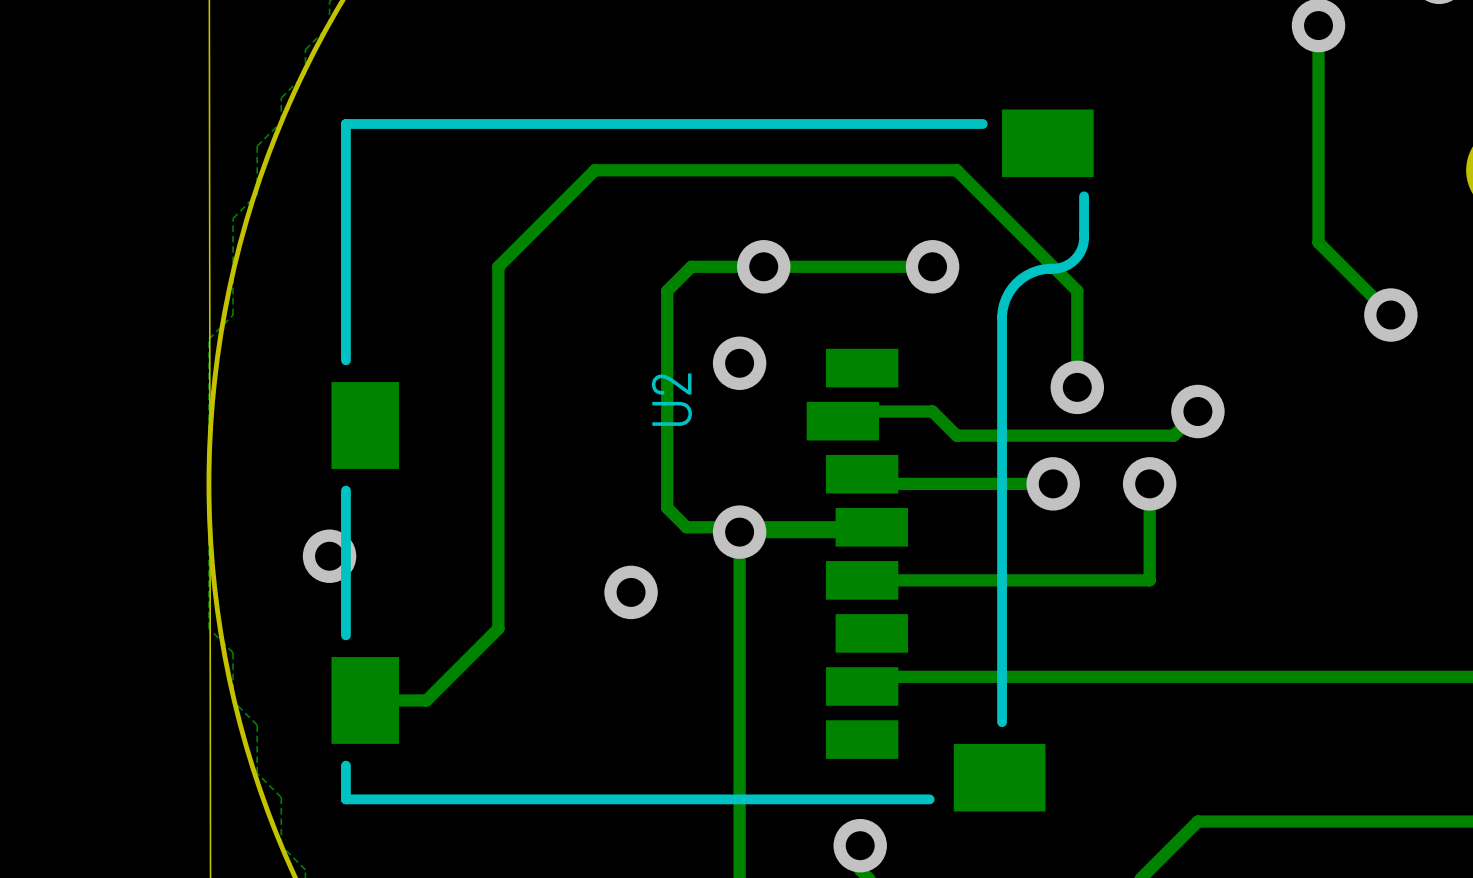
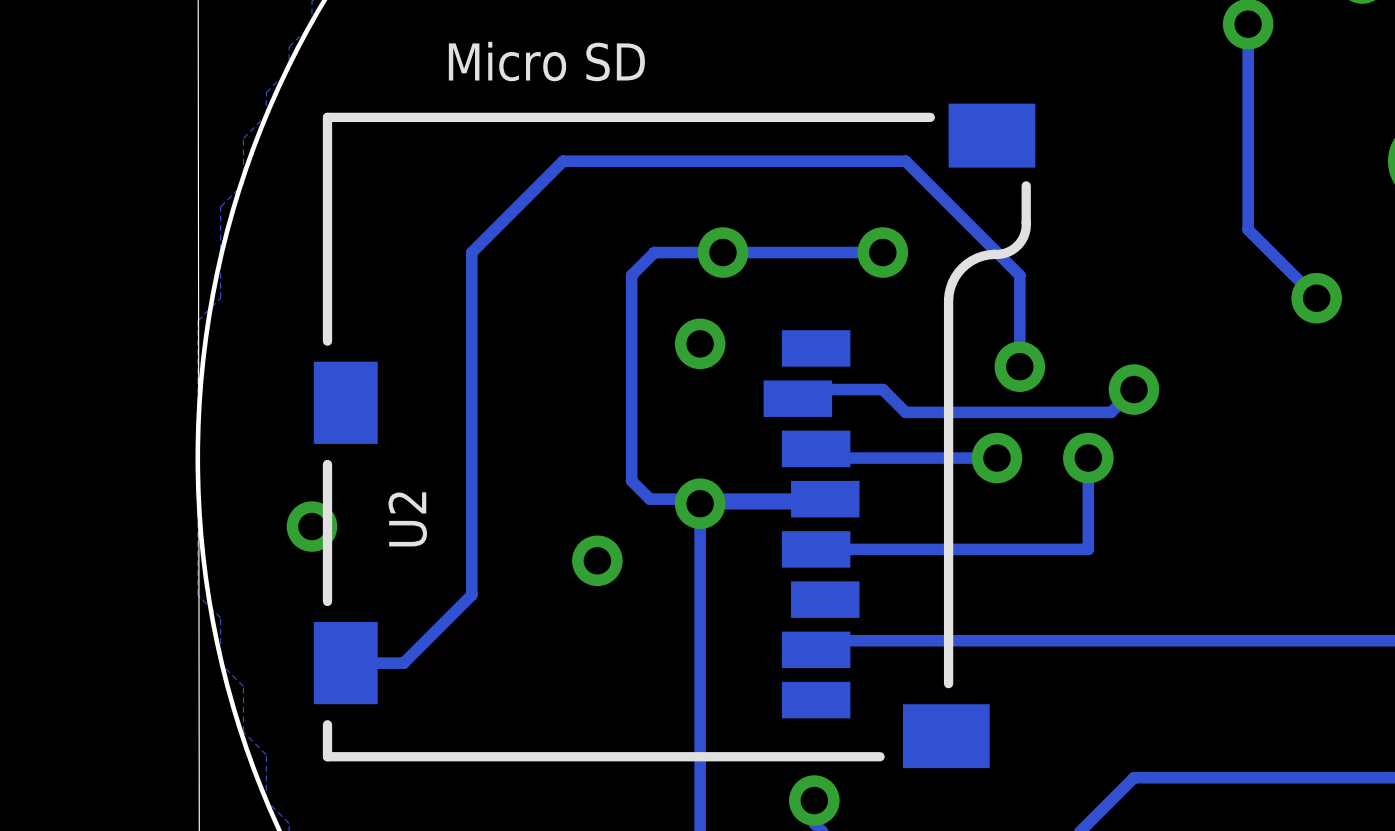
U2 value: none -> Micro SD (546, 61)
U2 name position: U2 (671, 399) -> U2 (407, 519)

